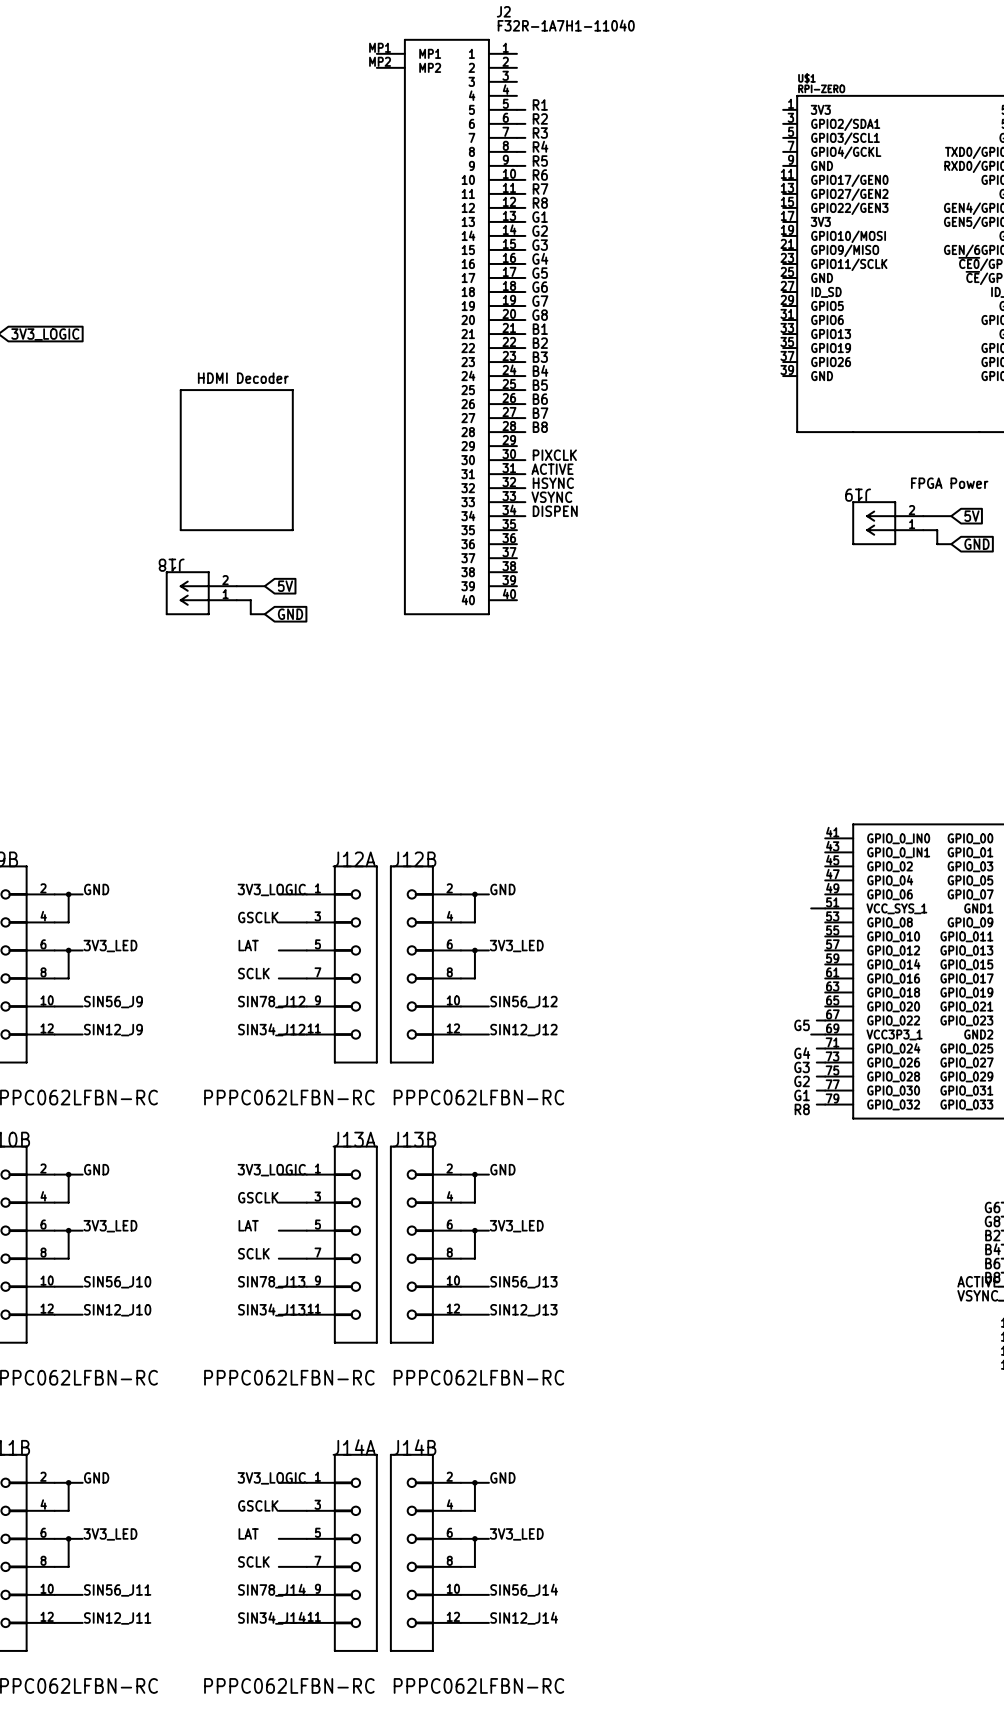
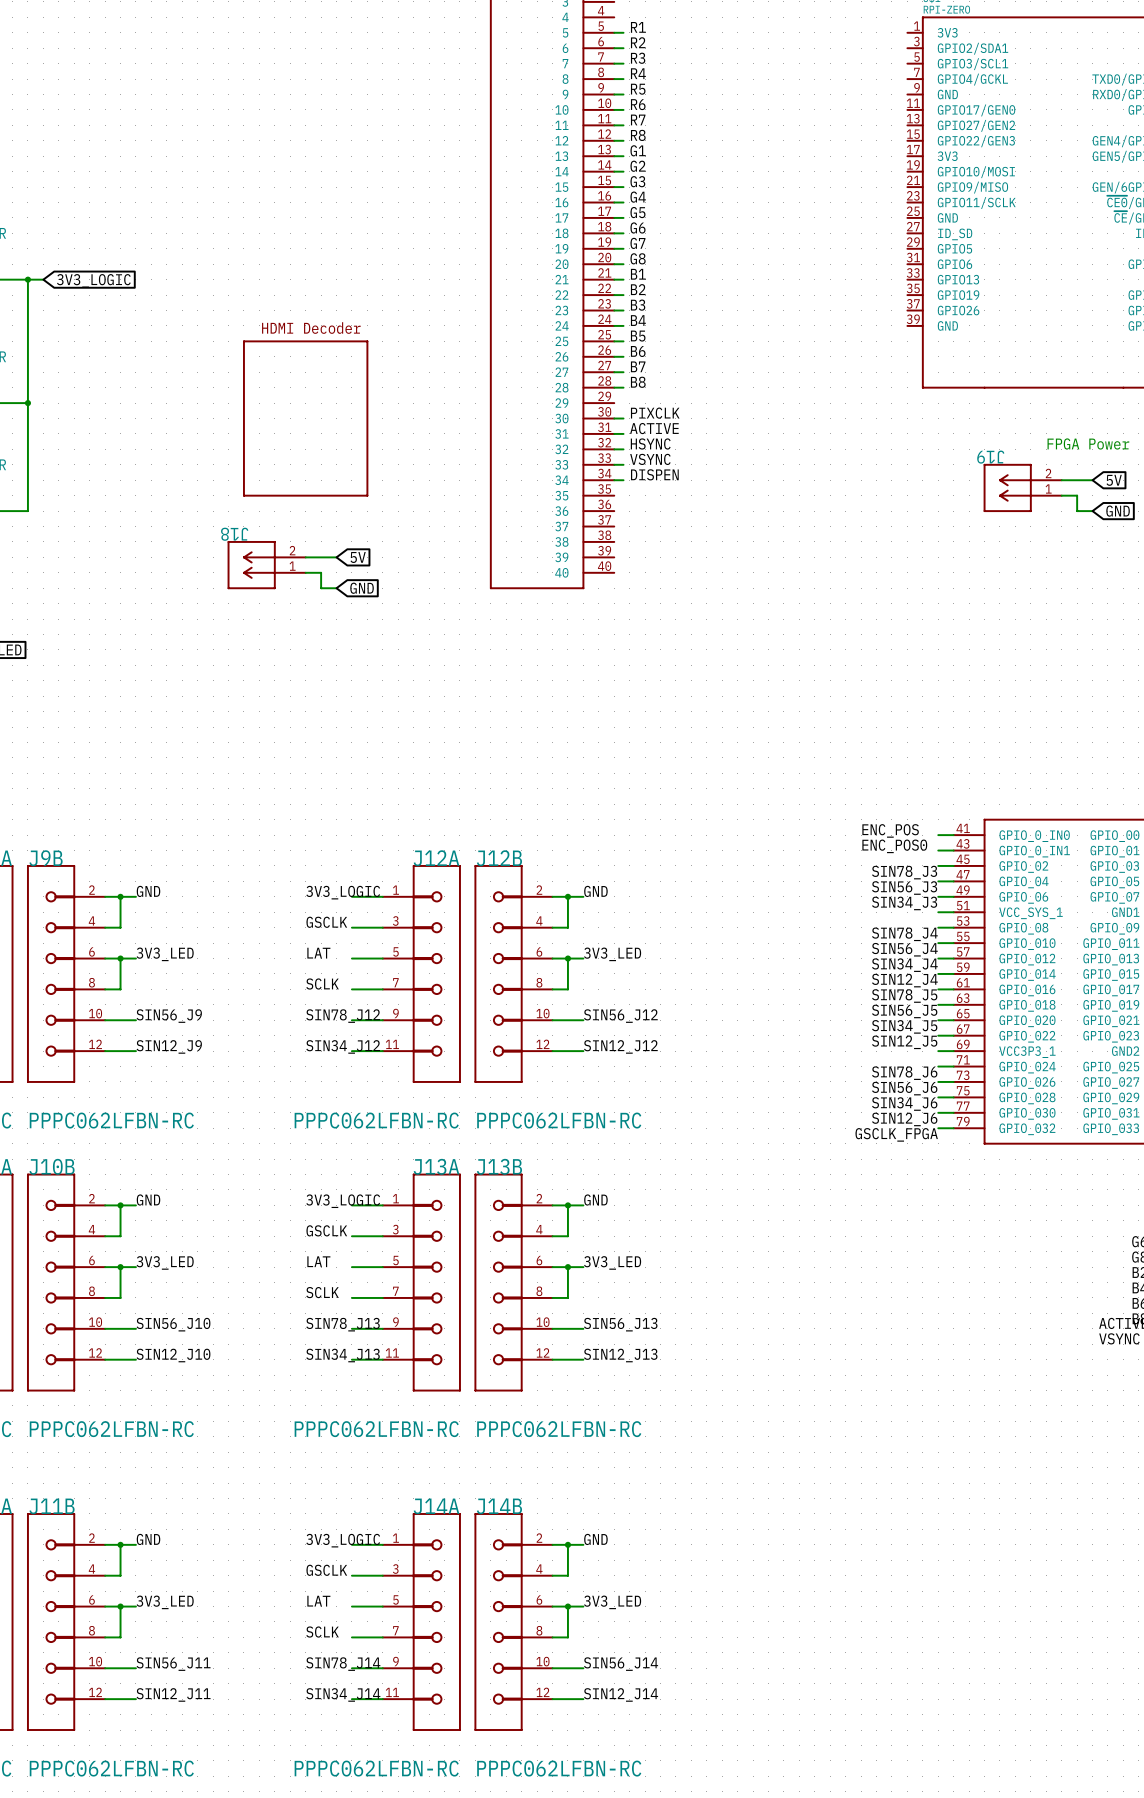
label: none -> ENC_POS (890, 830)
wire: none -> (938, 835) (953, 835)
label: none -> ENC_POS0 (894, 846)
wire: none -> (938, 850) (953, 850)
wire: none -> (938, 865) (953, 865)
label: none -> SIN78_J3 (904, 872)
wire: none -> (938, 881) (953, 881)
label: none -> SIN56_J3 (904, 888)
wire: none -> (938, 896) (953, 896)
label: none -> SIN34_J3 (904, 903)
wire: none -> (938, 927) (953, 927)
label: none -> SIN78_J4 (904, 934)
wire: none -> (938, 943) (953, 943)
label: none -> SIN56_J4 (904, 949)
wire: none -> (938, 958) (953, 958)
label: none -> SIN34_J4 (904, 965)
wire: none -> (938, 973) (953, 973)
label: none -> SIN12_J4 (904, 980)
wire: none -> (938, 989) (953, 989)
label: none -> SIN78_J5 (904, 996)
wire: none -> (938, 1004) (953, 1004)
label: none -> SIN56_J5 (904, 1011)
wire: none -> (938, 1020) (953, 1020)
label: none -> SIN34_J5 (904, 1026)
wire: none -> (938, 1035) (944, 1035)
label: G5 (802, 1025) -> SIN12_J5 (904, 1042)
wire: none -> (938, 1066) (944, 1066)
label: G4 (802, 1053) -> SIN78_J6 (904, 1073)
wire: none -> (938, 1081) (944, 1081)
label: G3 (802, 1067) -> SIN56_J6 (904, 1088)
wire: none -> (938, 1097) (944, 1097)
label: G2 (802, 1081) -> SIN34_J6 (904, 1104)
wire: none -> (938, 1112) (944, 1112)
label: G1 (802, 1095) -> SIN12_J6 (904, 1119)
wire: none -> (938, 1128) (944, 1128)
label: R8 (802, 1109) -> GSCLK_FPGA (896, 1134)

